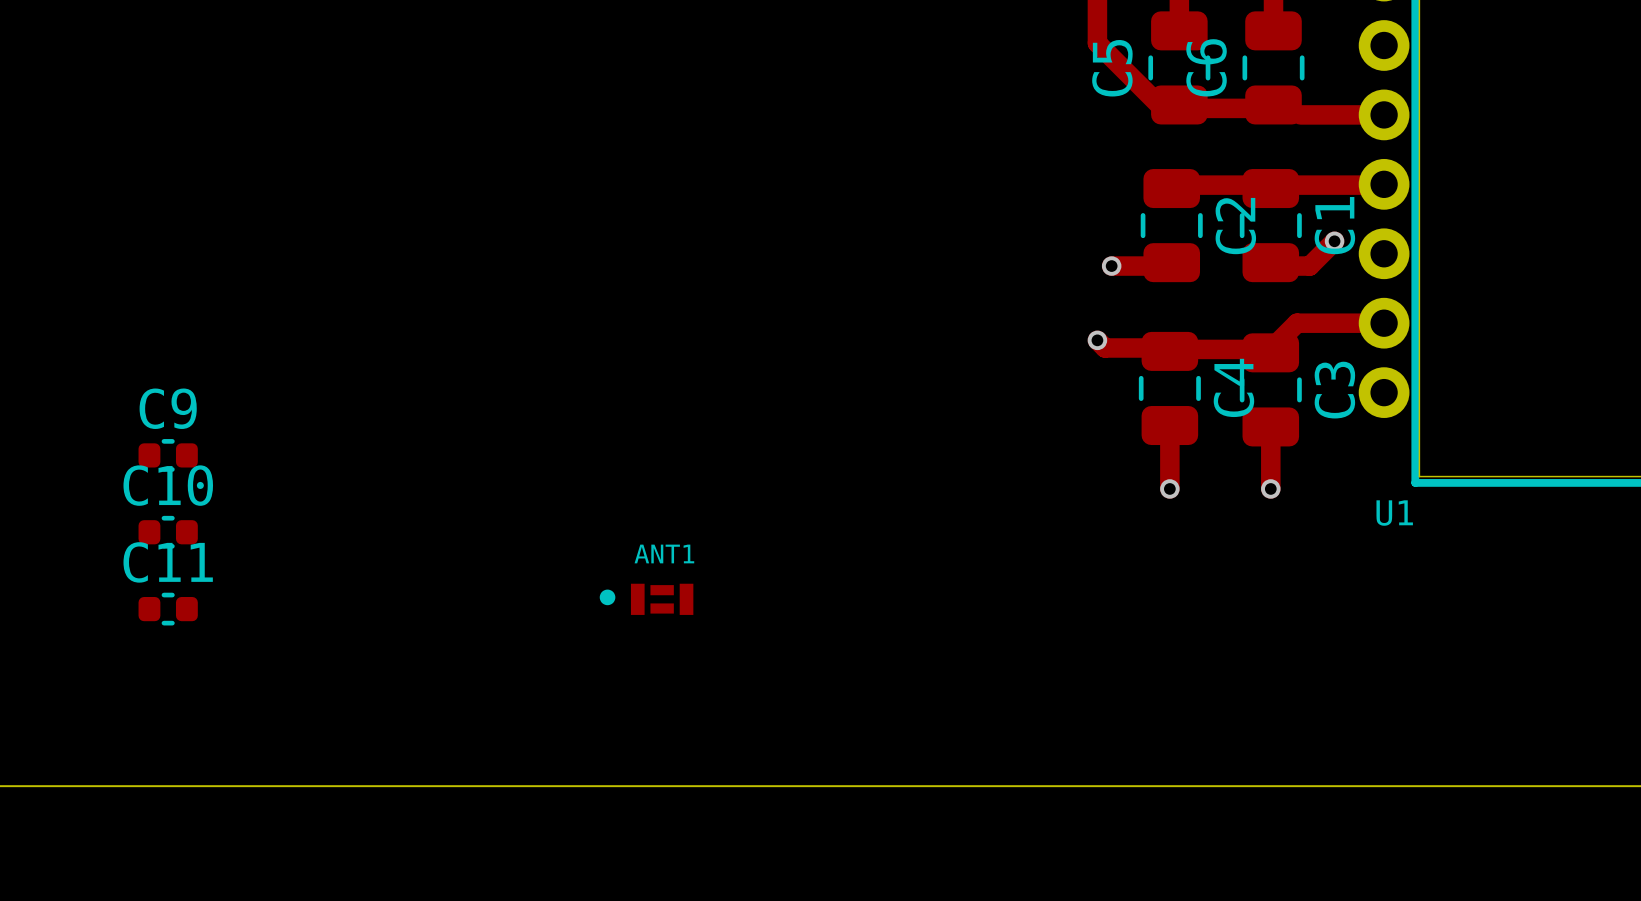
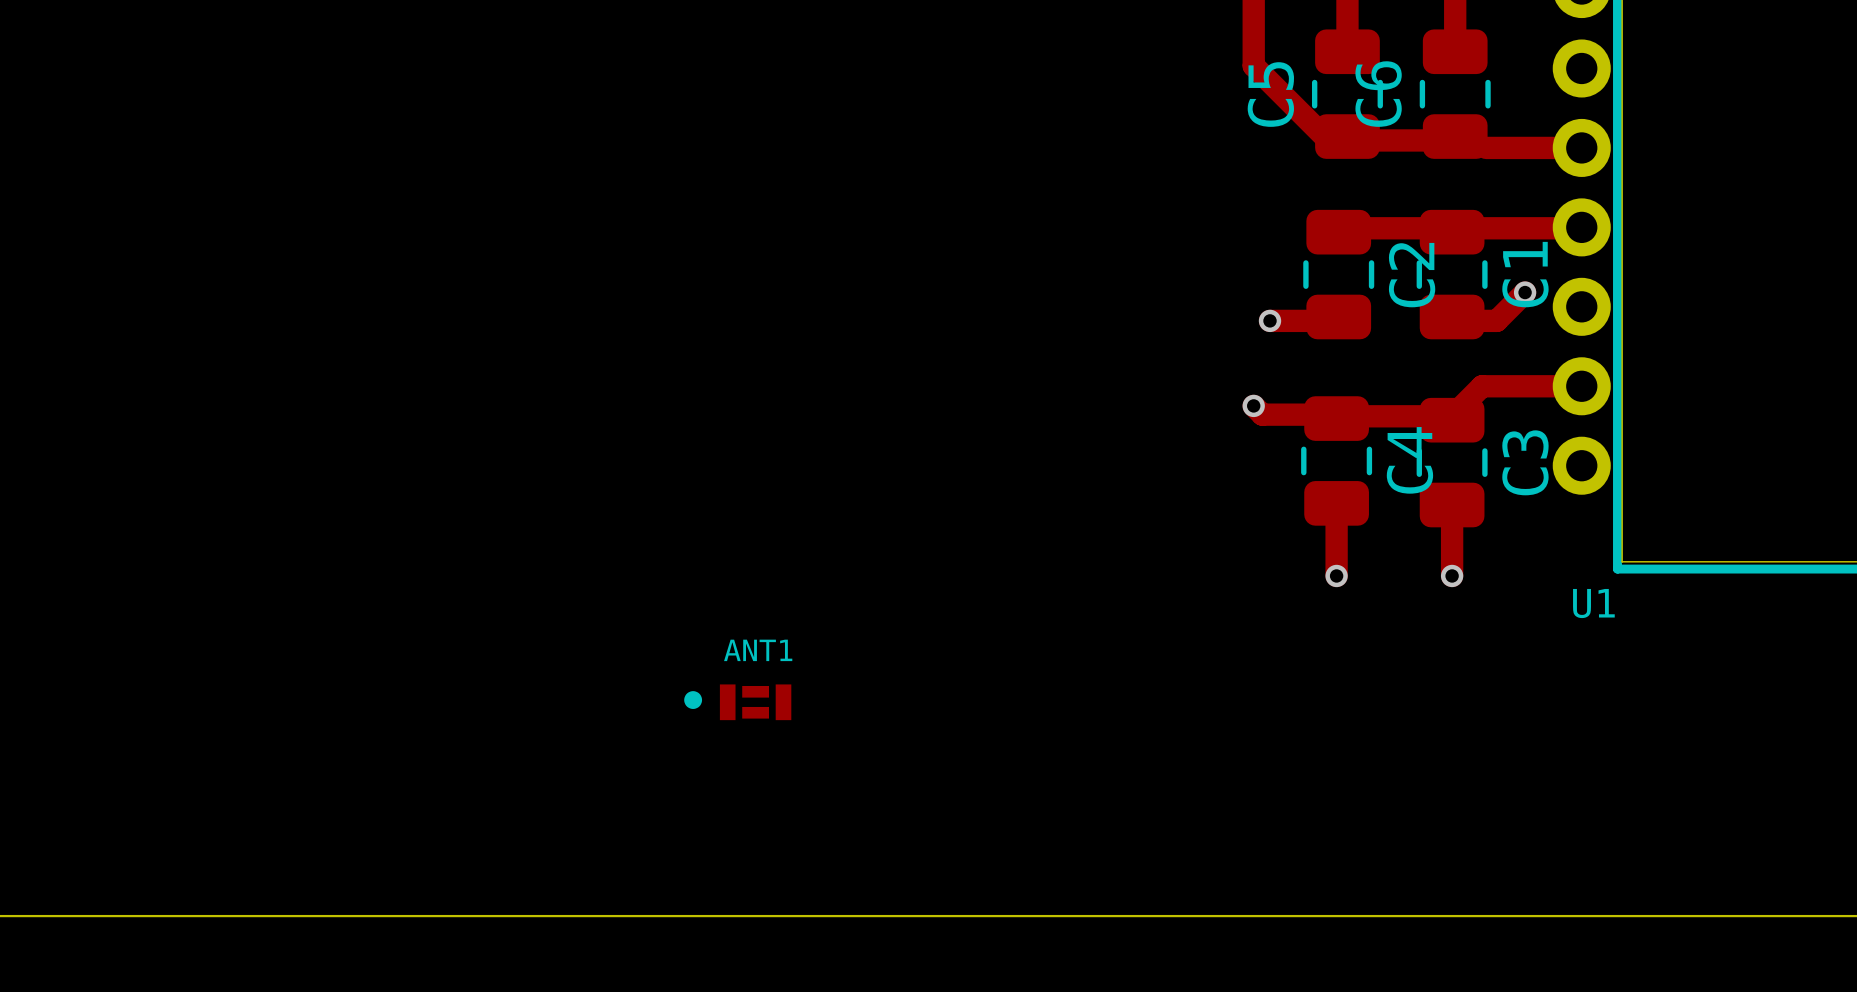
C9: (168, 455) -> none
C10: (168, 532) -> none
C11: (168, 609) -> none

